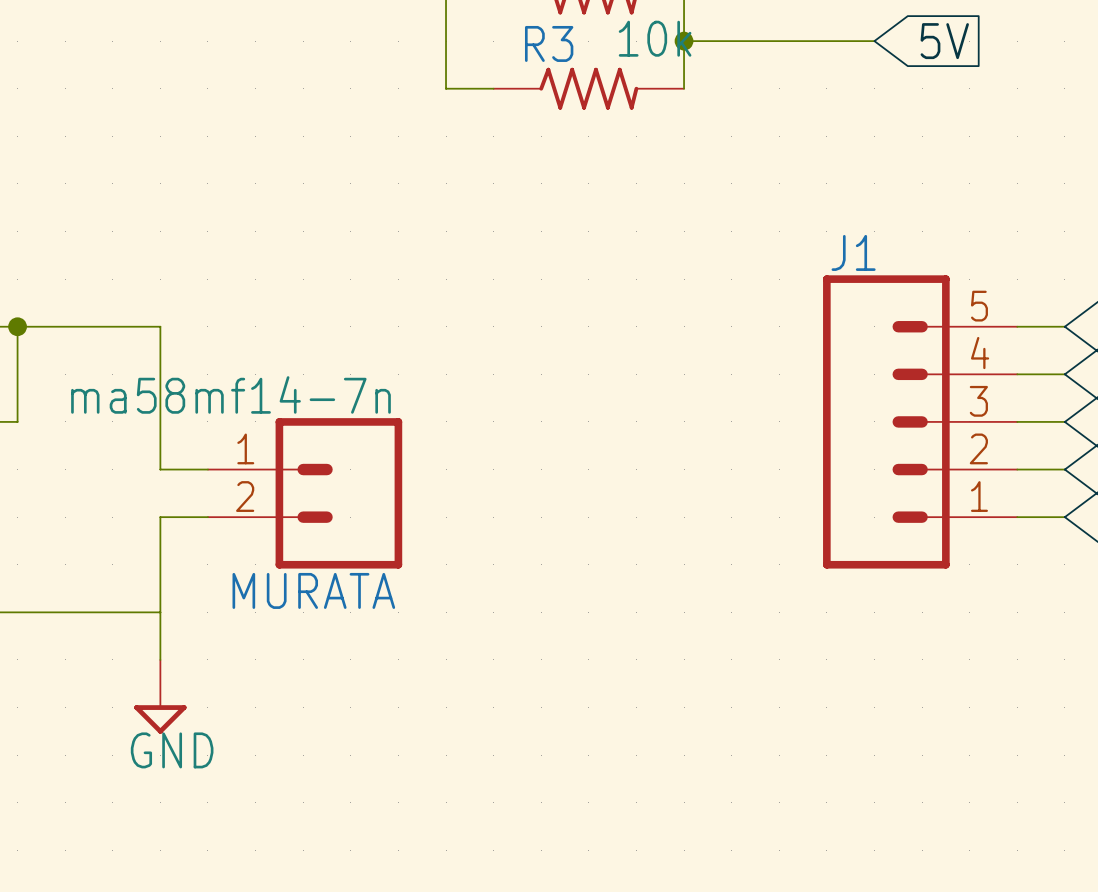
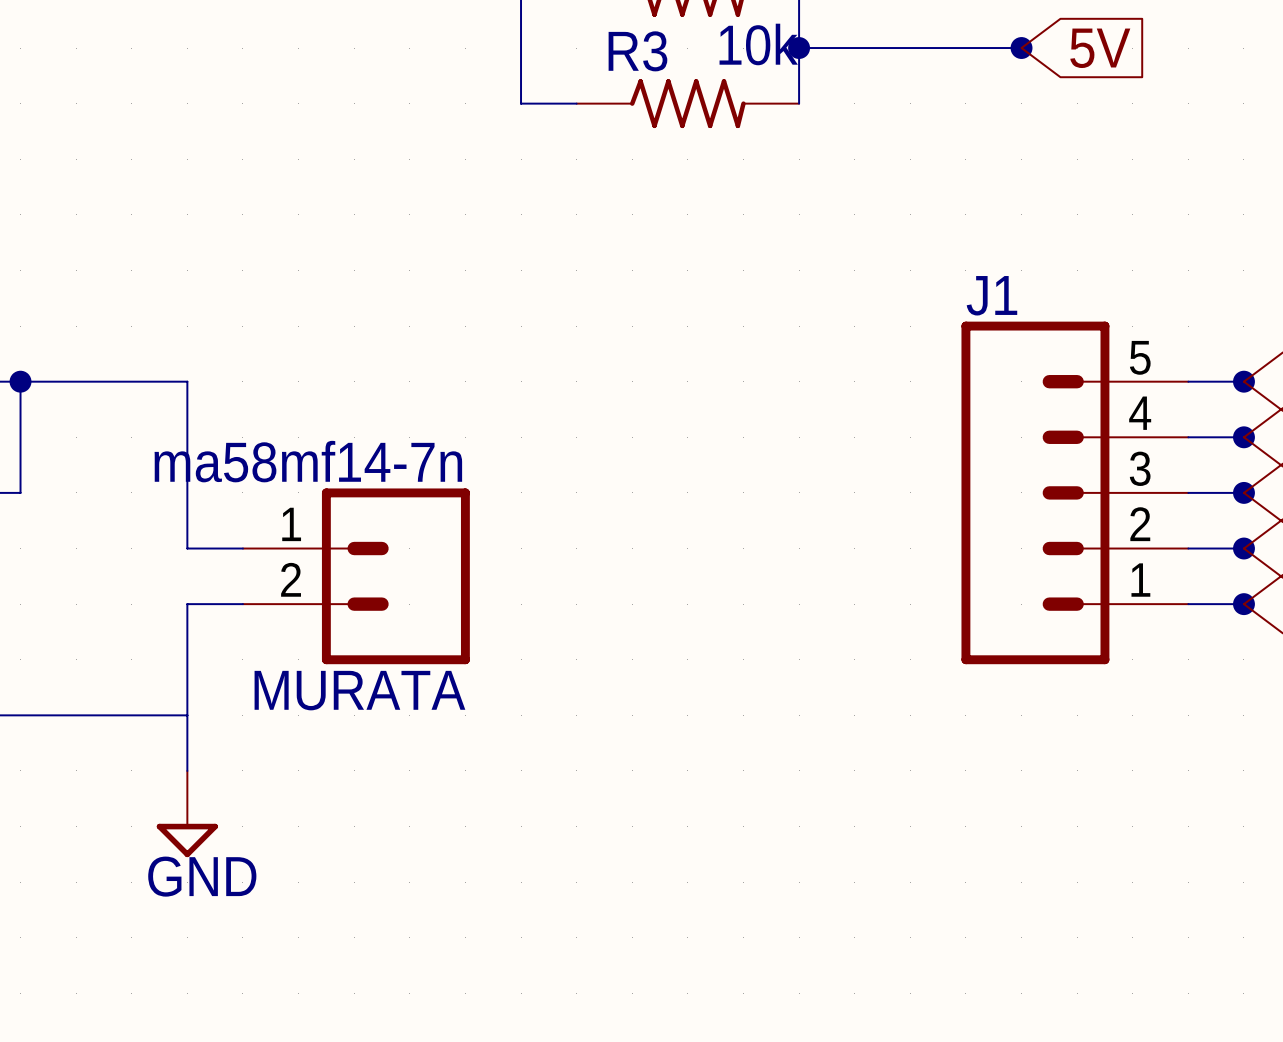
junction: none -> (1021, 48)
junction: none -> (1243, 381)
junction: none -> (1243, 437)
junction: none -> (1243, 492)
junction: none -> (1243, 548)
junction: none -> (1243, 604)

